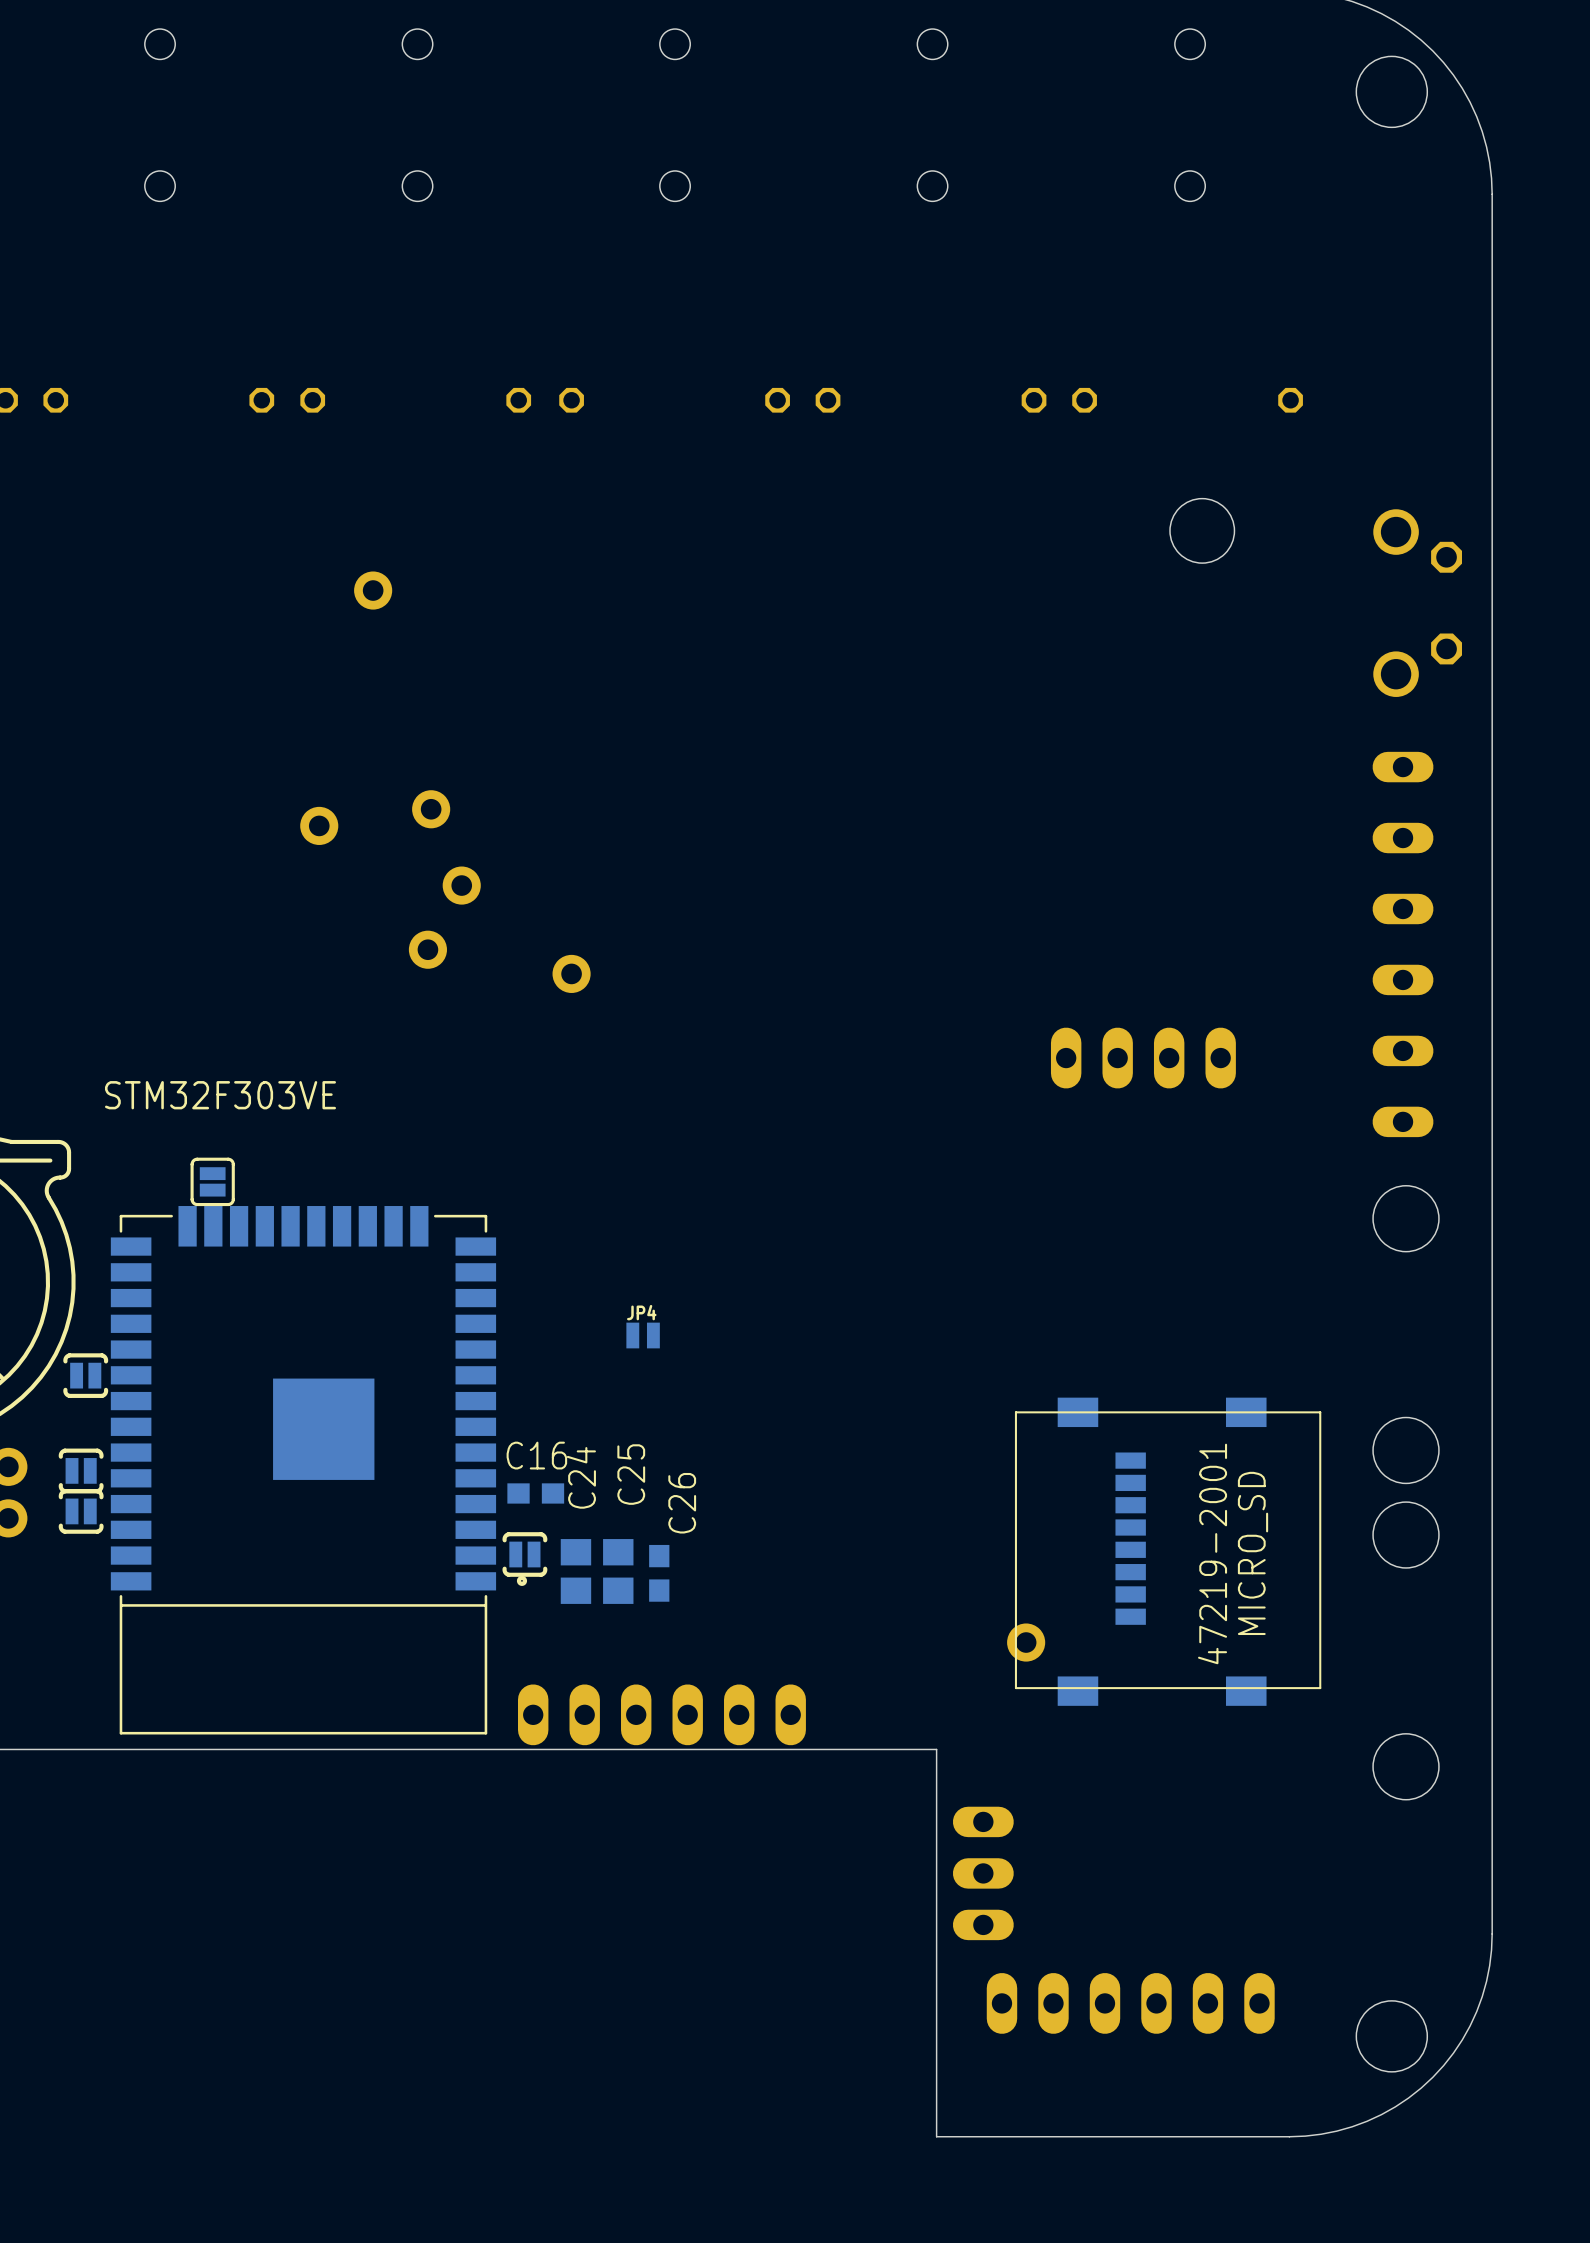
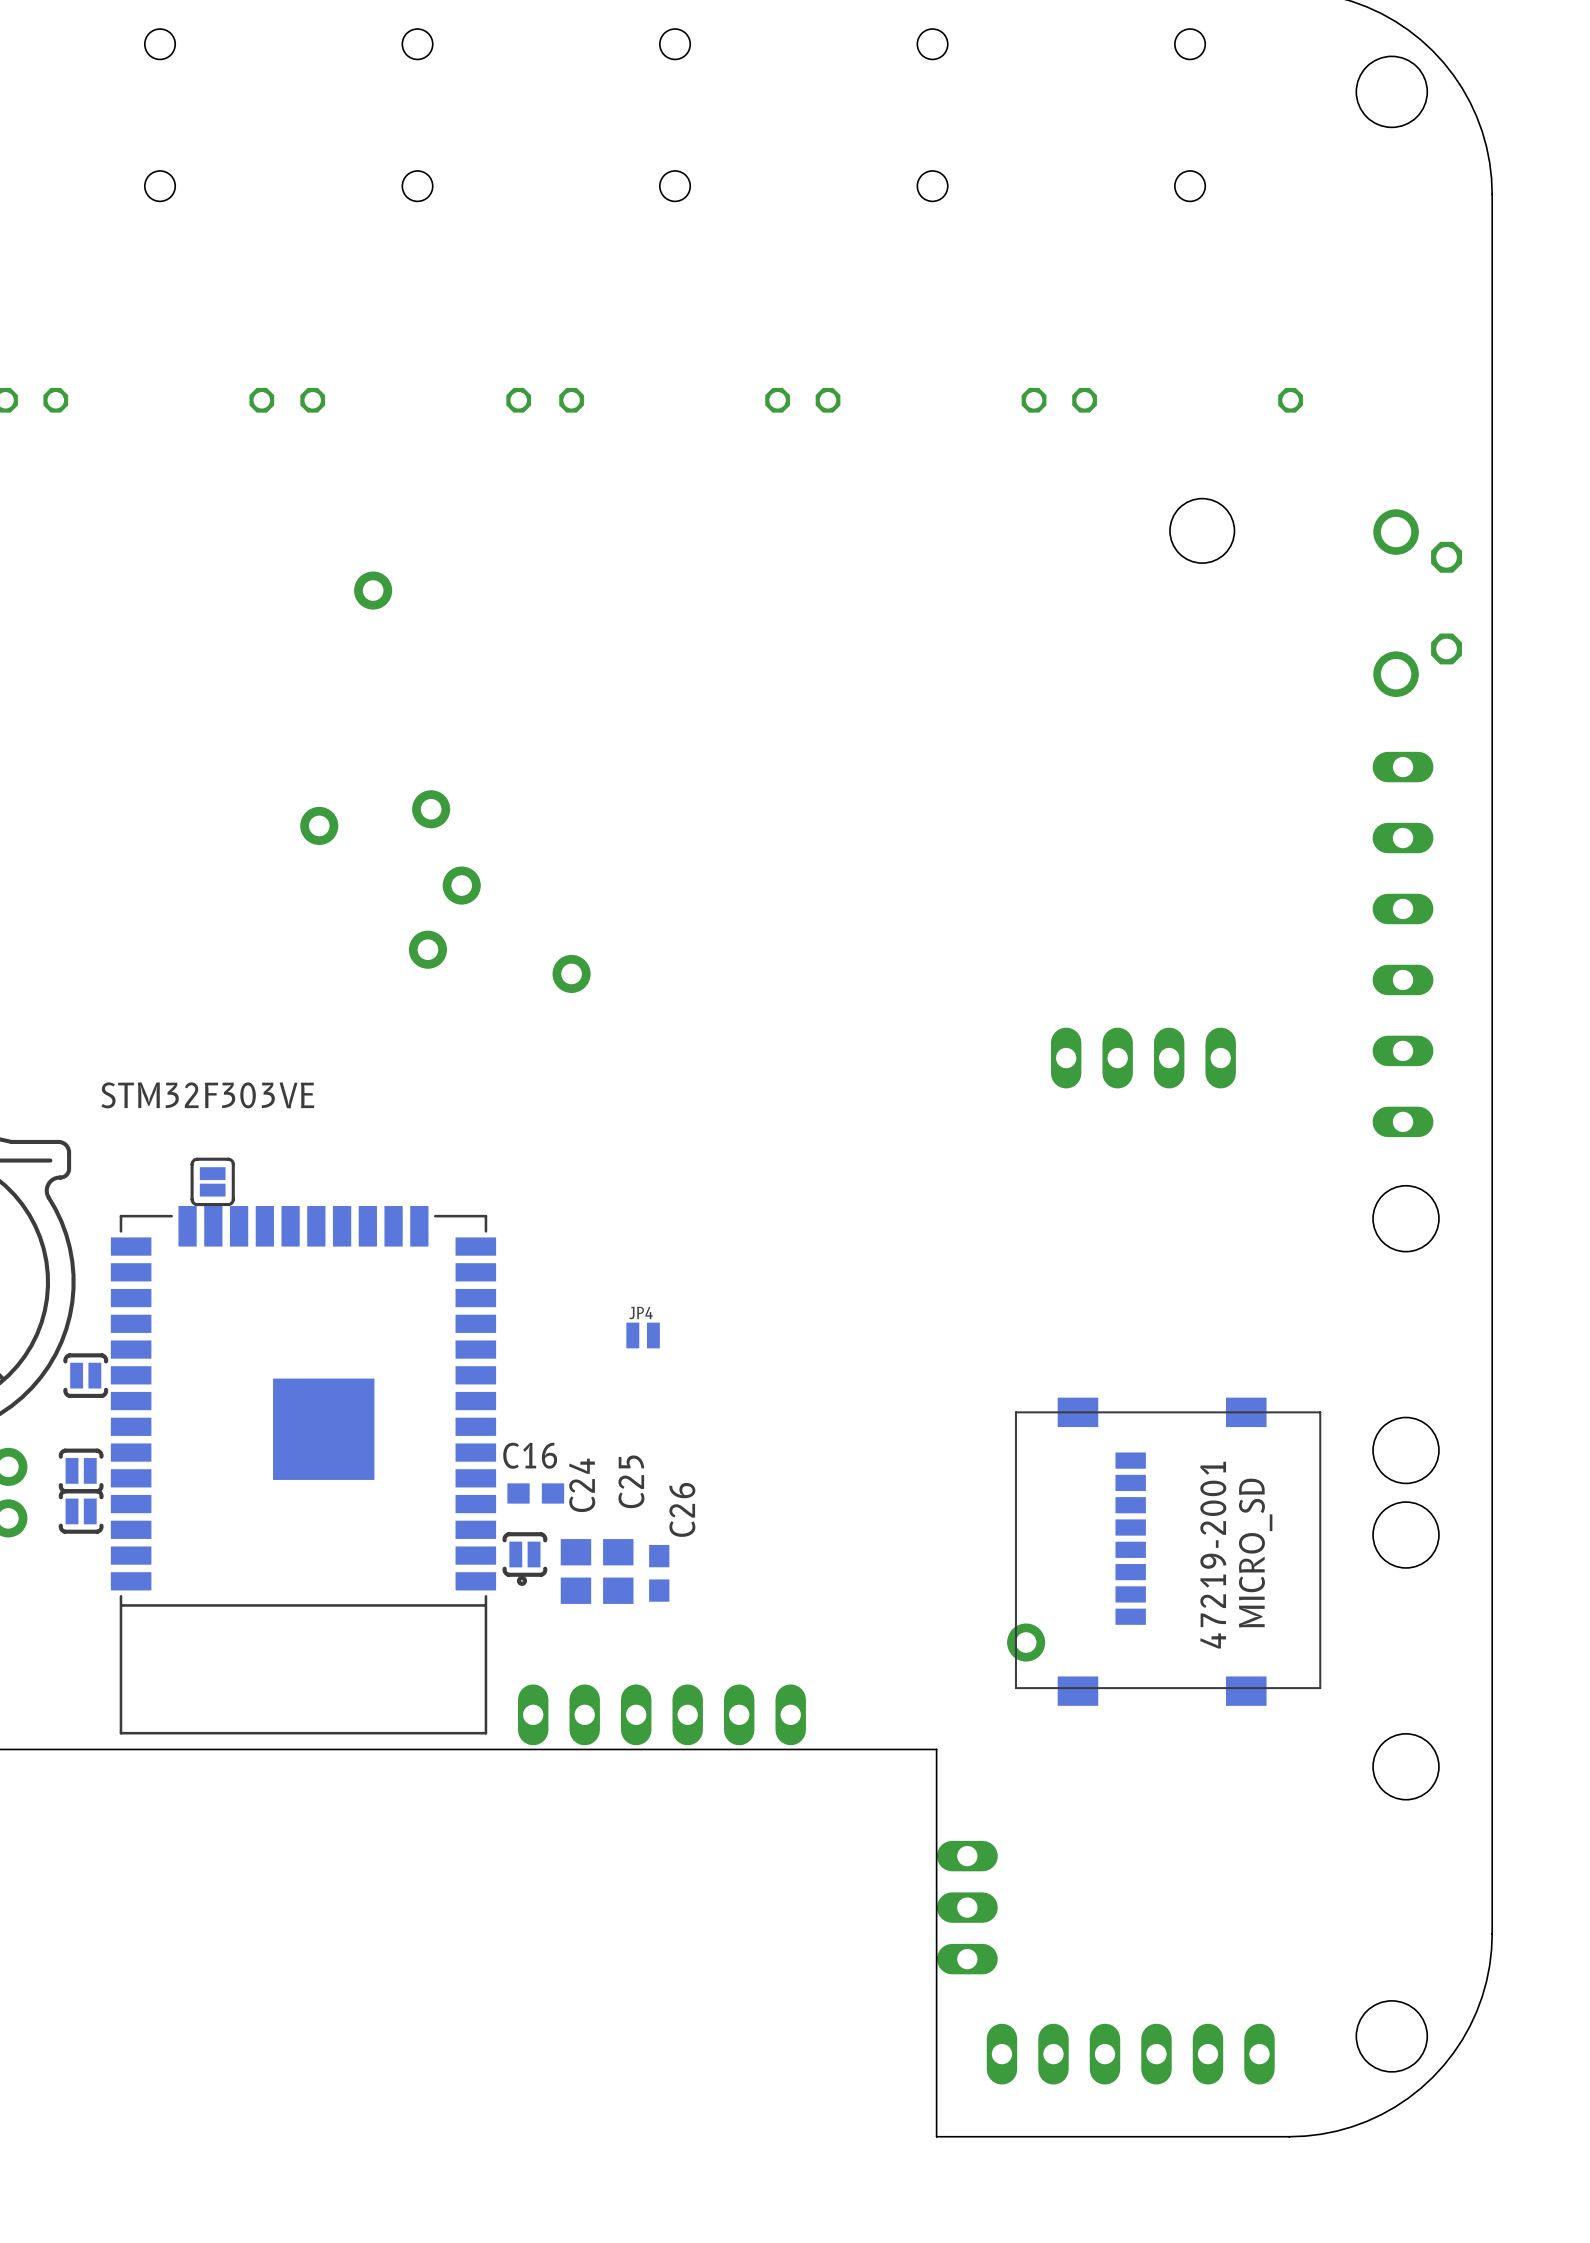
part position: (983, 1873) -> (967, 1907)
part position: (1130, 2003) -> (1130, 2054)

